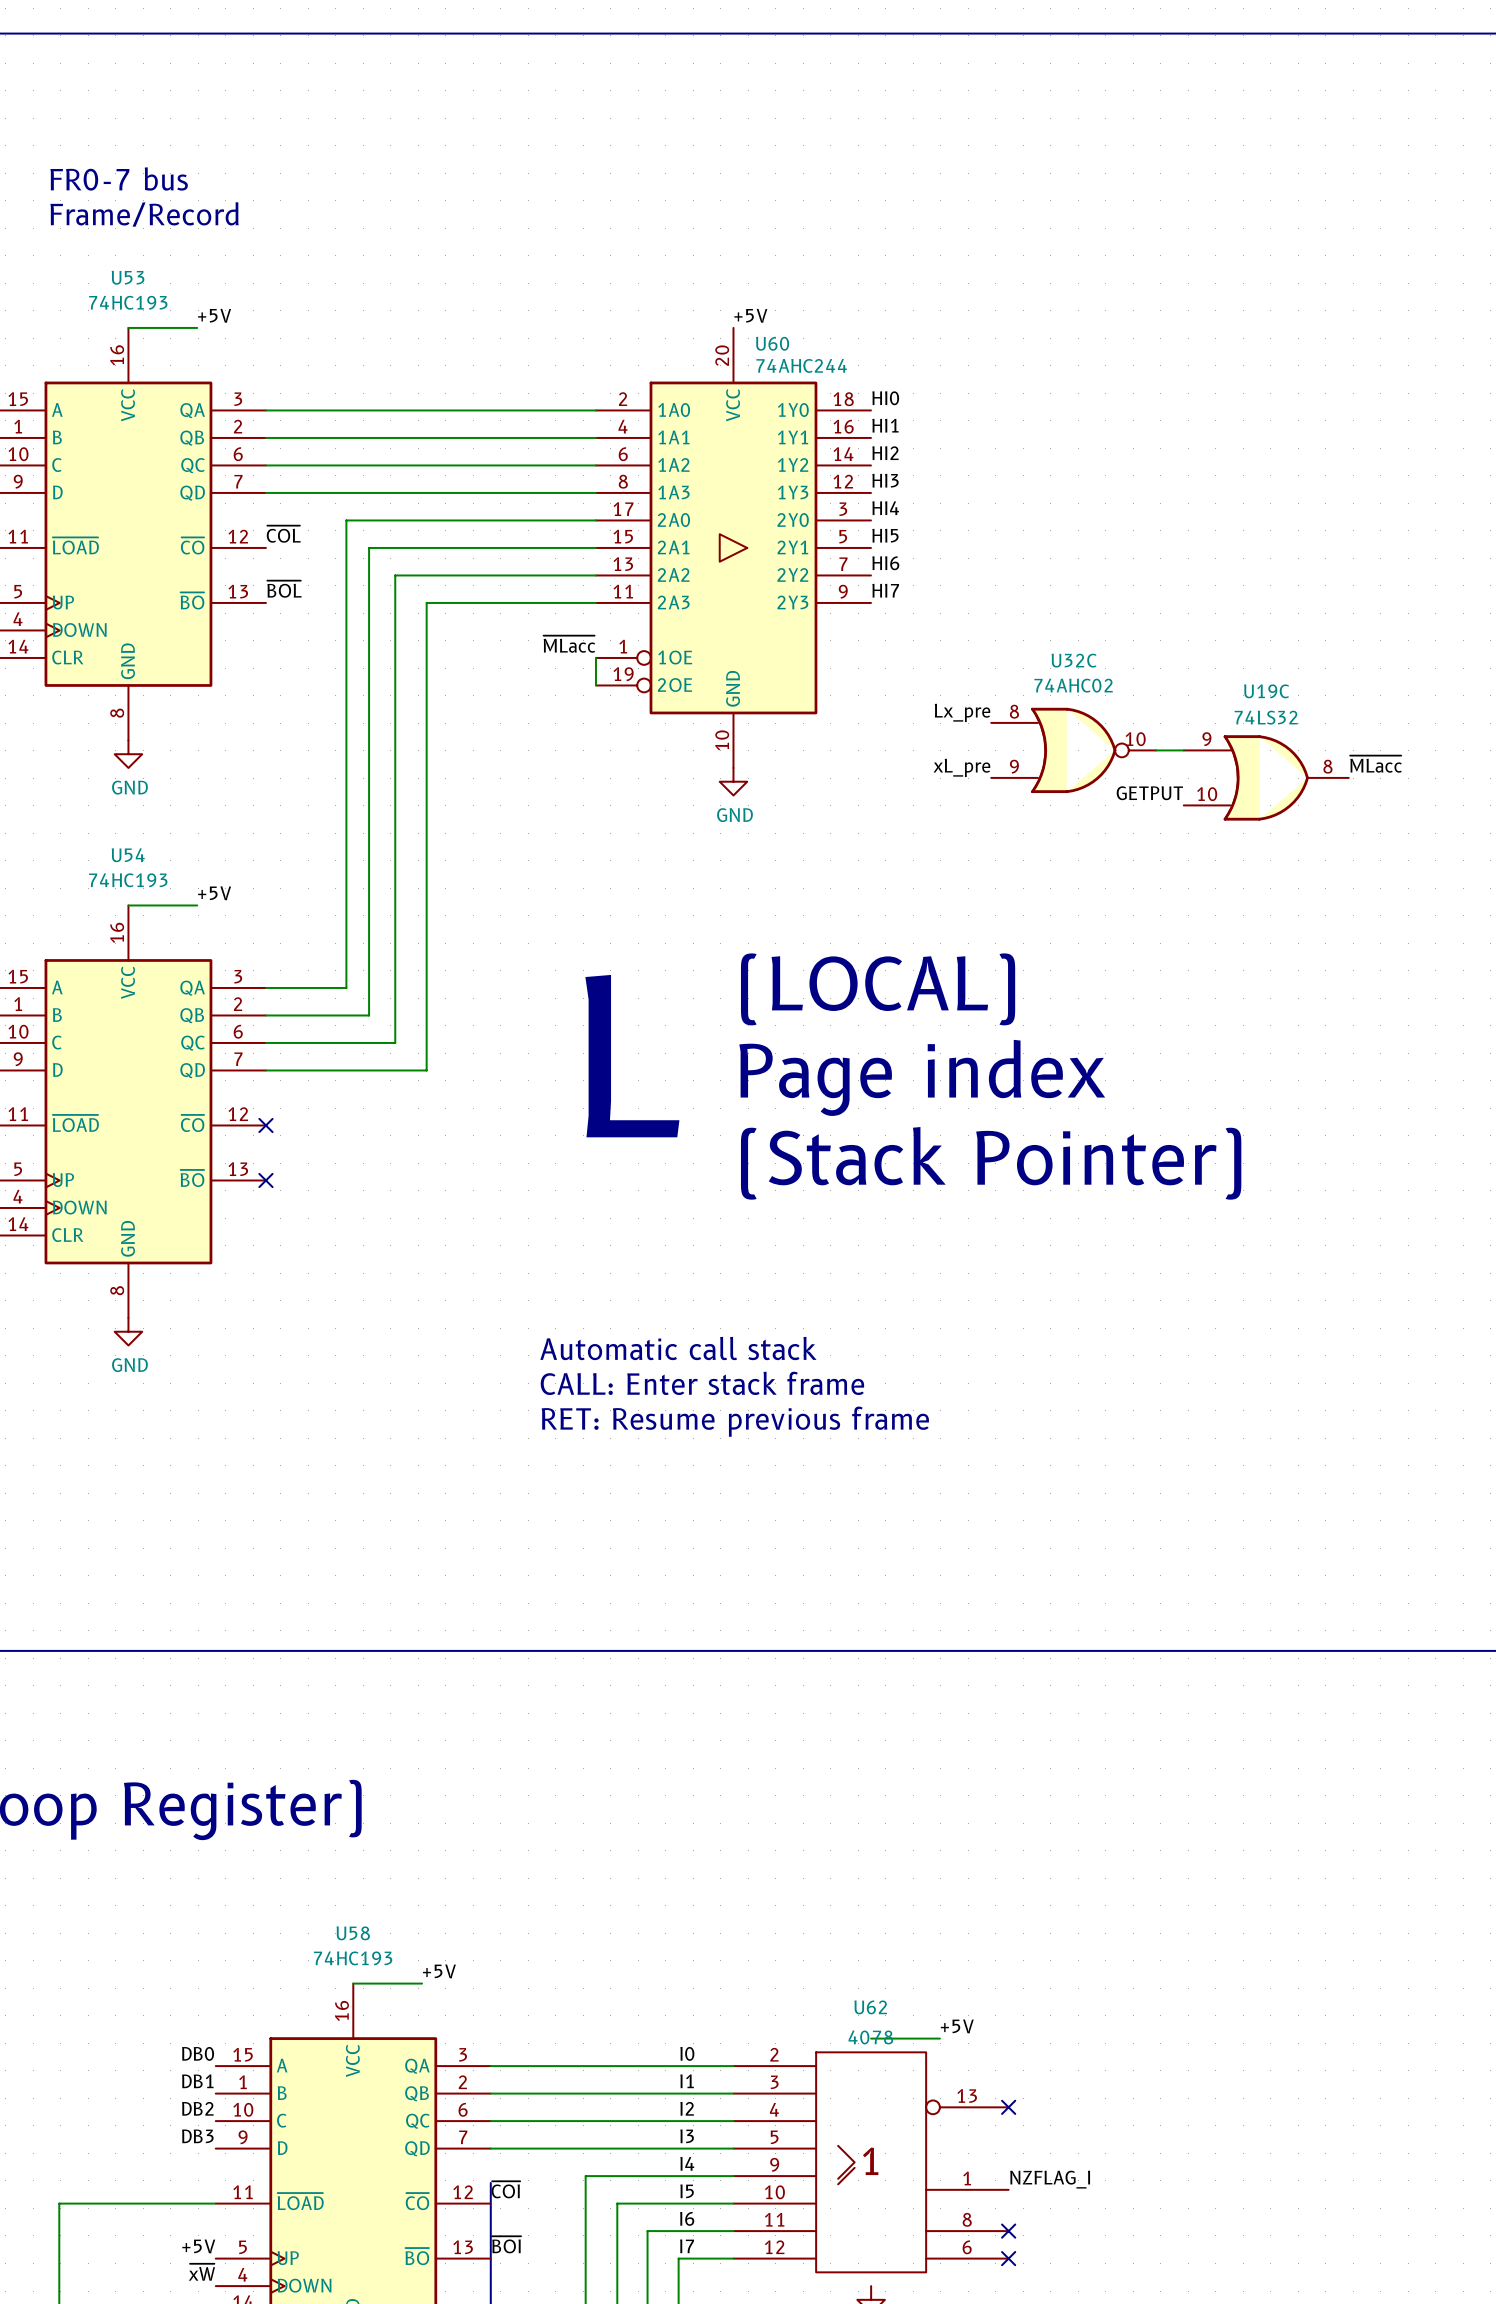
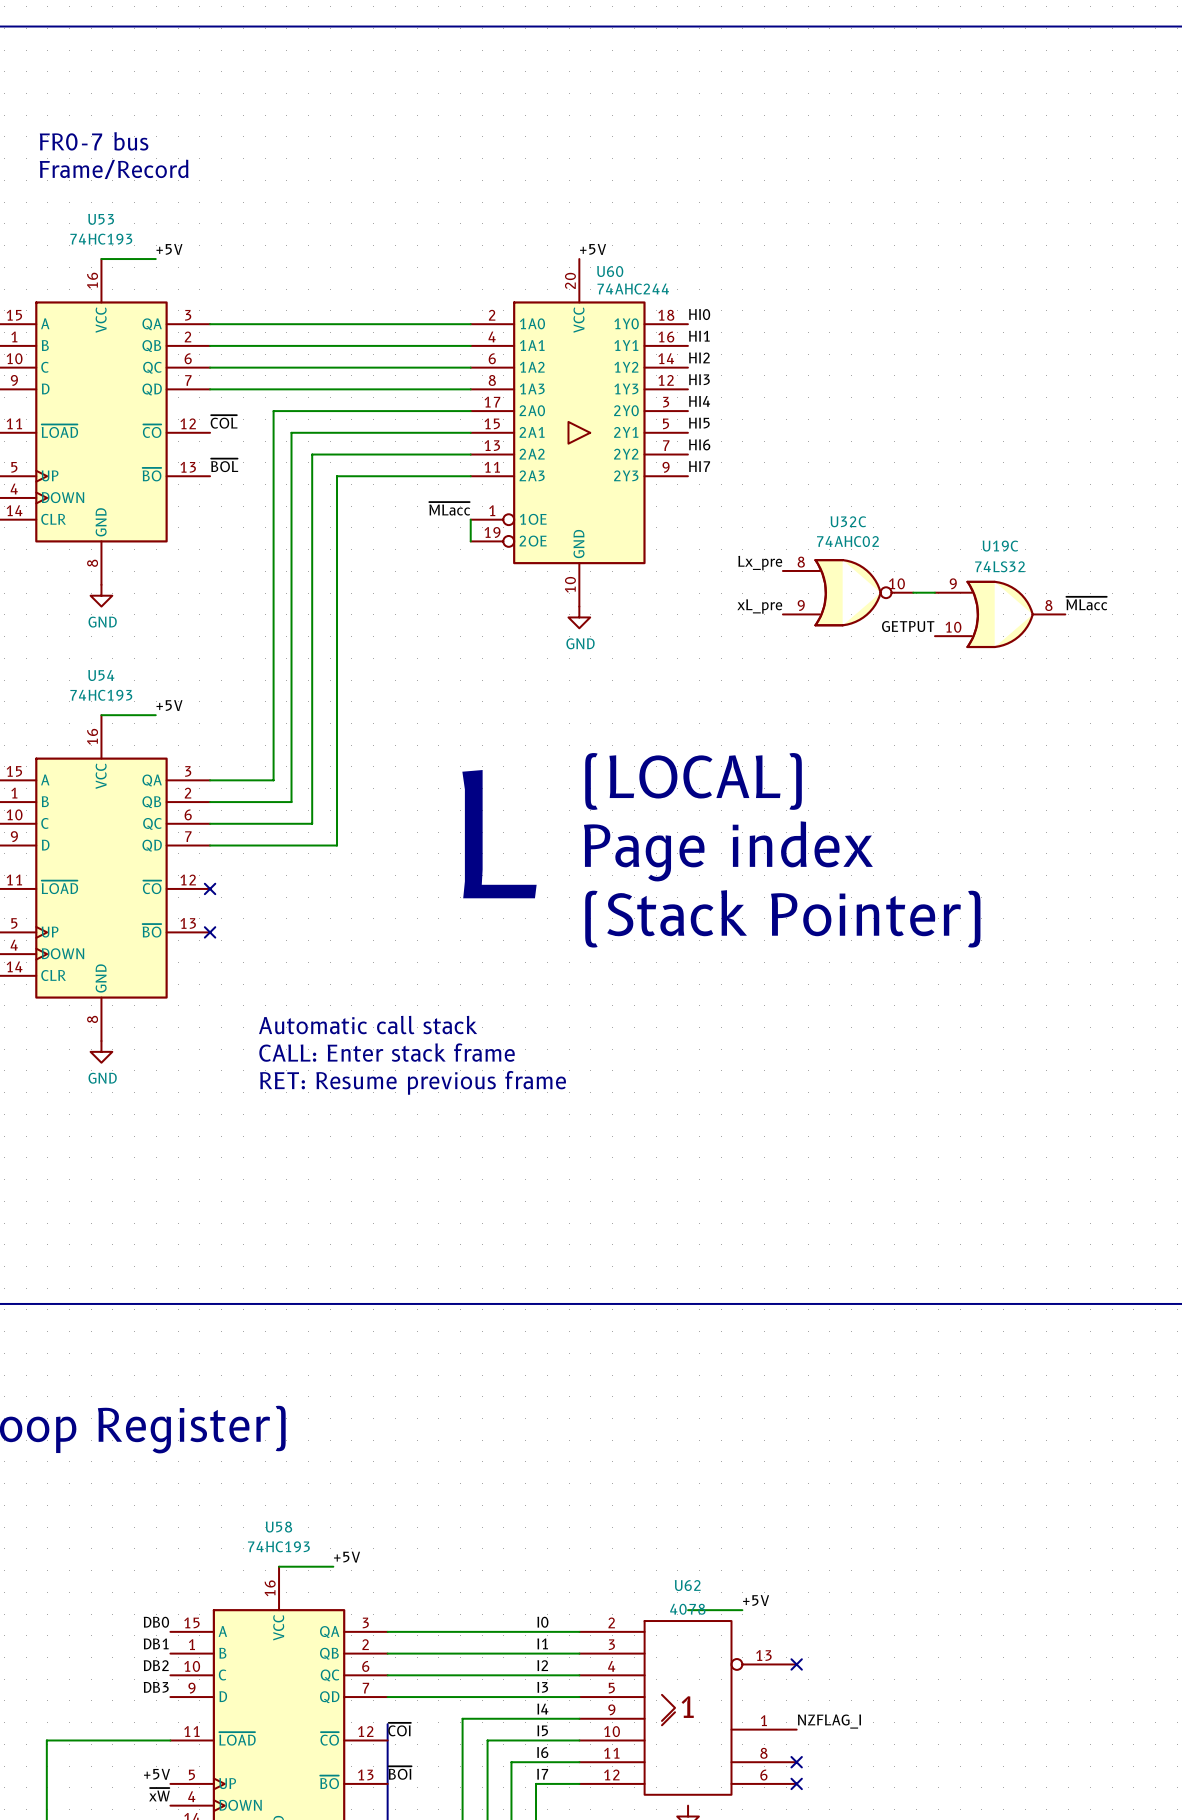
text position: Automatic call stack (678, 1348) -> Automatic call stack (368, 1025)
text position: CALL: Enter stack frame (702, 1383) -> CALL: Enter stack frame (387, 1052)
text position: RET: Resume previous frame (735, 1421) -> RET: Resume previous frame (413, 1082)

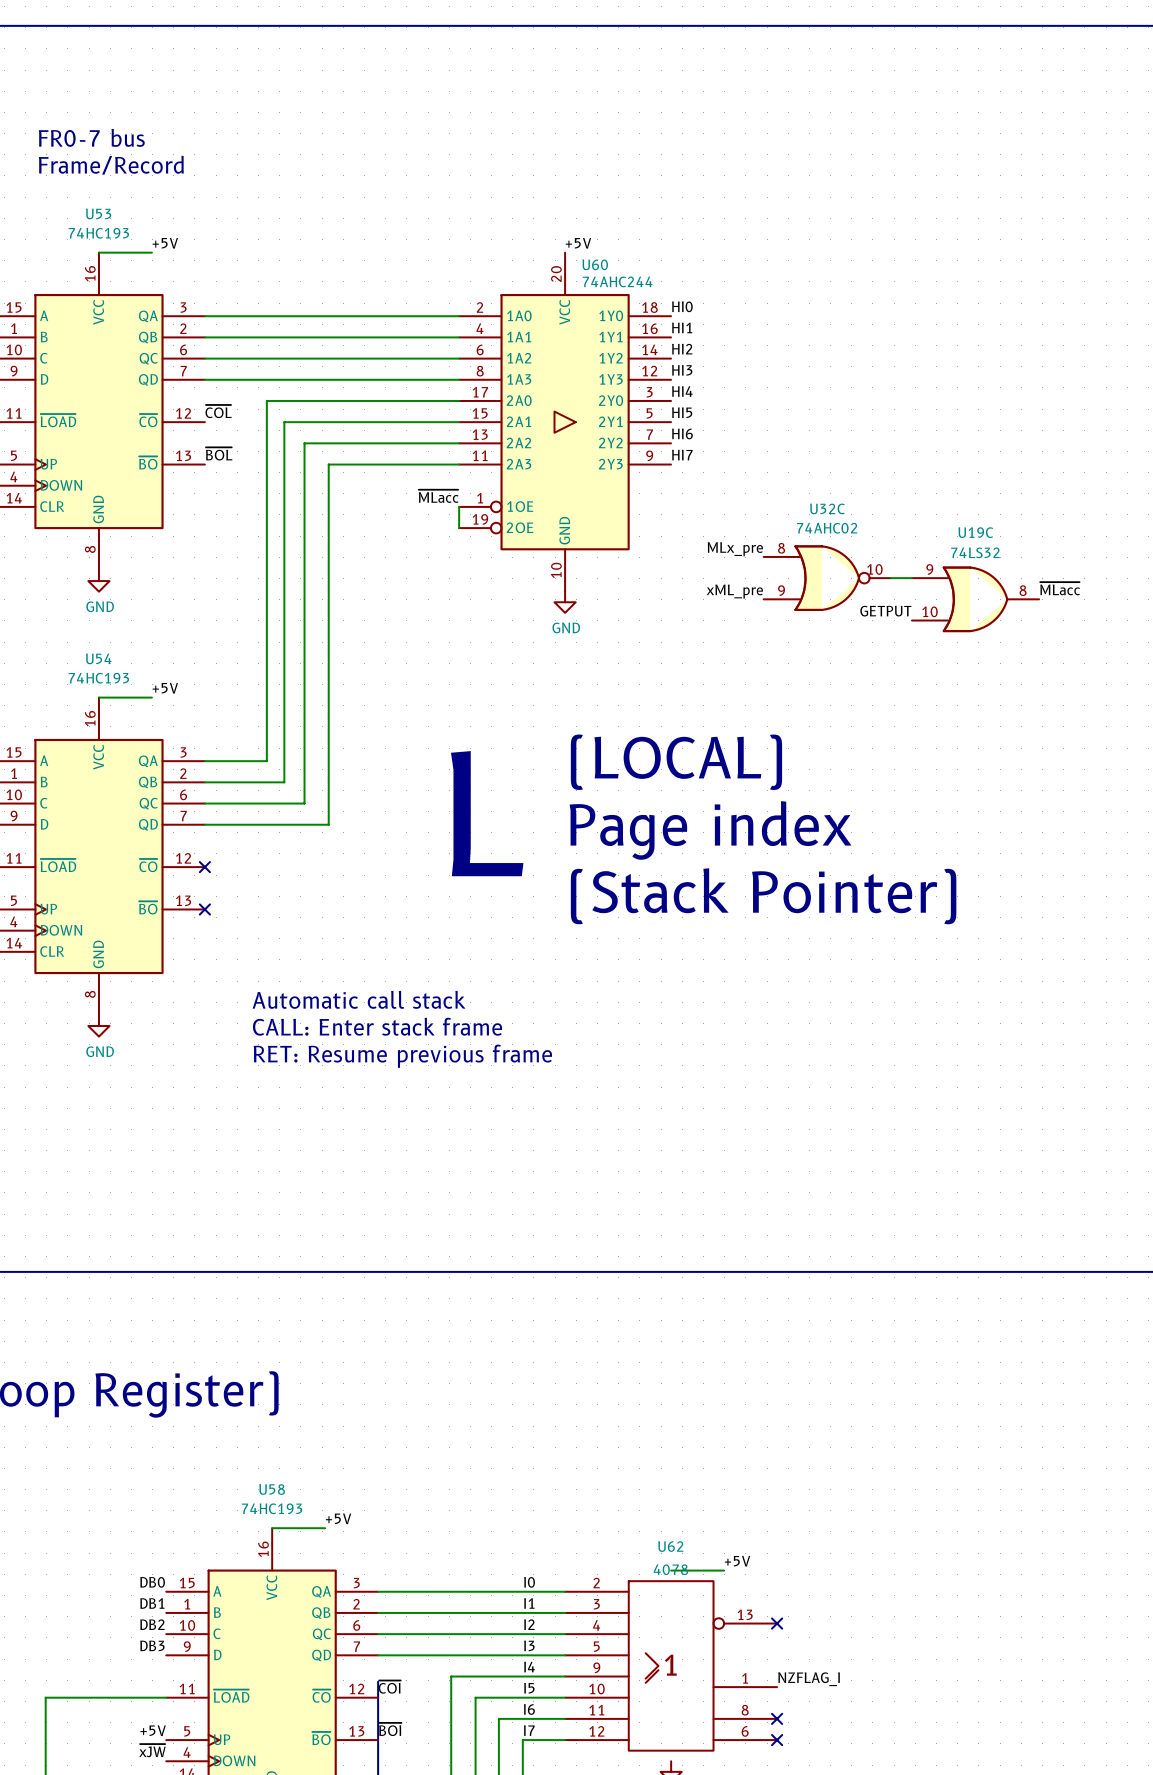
label: Lx_pre (760, 563) -> MLx_pre (735, 549)
label: xL_pre (759, 606) -> xML_pre (734, 591)
label: ~{xW} (159, 1794) -> ~{xJW} (152, 1750)

